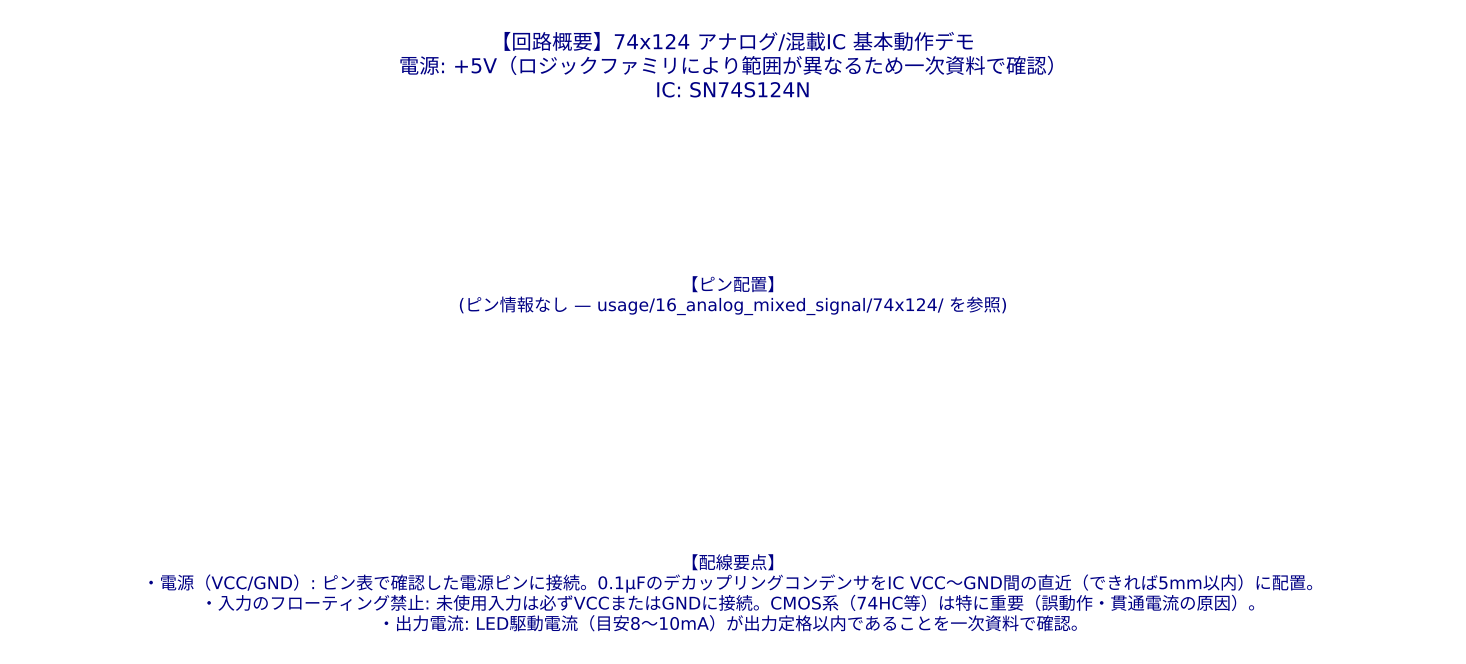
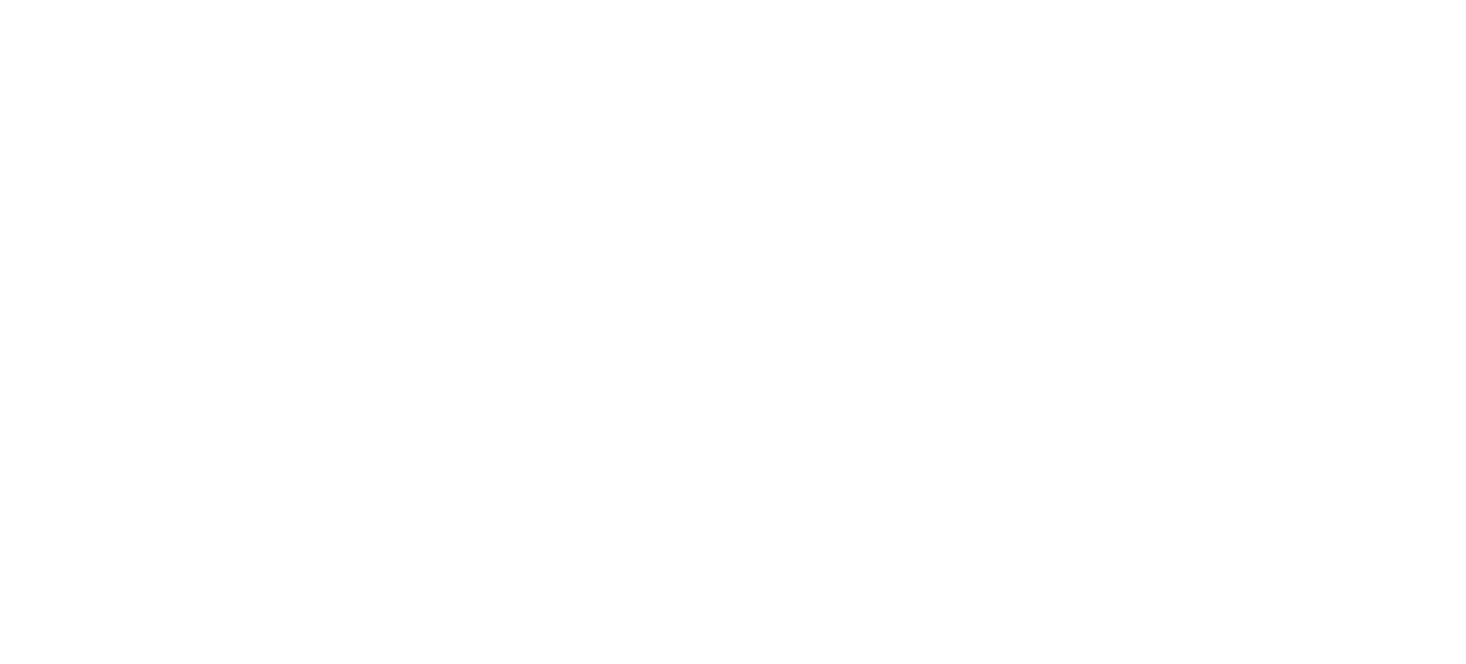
text: 【回路概要】74x124 アナログ/混載IC 基本動作デモ (738, 41) -> none
text: 電源: +5V（ロジックファミリにより範囲が異なるため一次資料で確認） (726, 65) -> none
text: IC: SN74S124N (732, 89) -> none
text: 【ピン配置】 (732, 284) -> none
text: (ピン情報なし — usage/16_analog_mixed_signal/74x124/ を参照) (732, 305) -> none
text: 【配線要点】 (732, 562) -> none
text: ・電源（VCC/GND）: ピン表で確認した電源ピンに接続。0.1µFのデカップリングコンデンサをIC VCC〜GND間の直近（できれば5mm以内）に配置。 (730, 583) -> none
text: ・入力のフローティング禁止: 未使用入力は必ずVCCまたはGNDに接続。CMOS系（74HC等）は特に重要（誤動作・貫通電流の原因）。 (730, 602) -> none
text: ・出力電流: LED駆動電流（目安8〜10mA）が出力定格以内であることを一次資料で確認。 (730, 623) -> none

